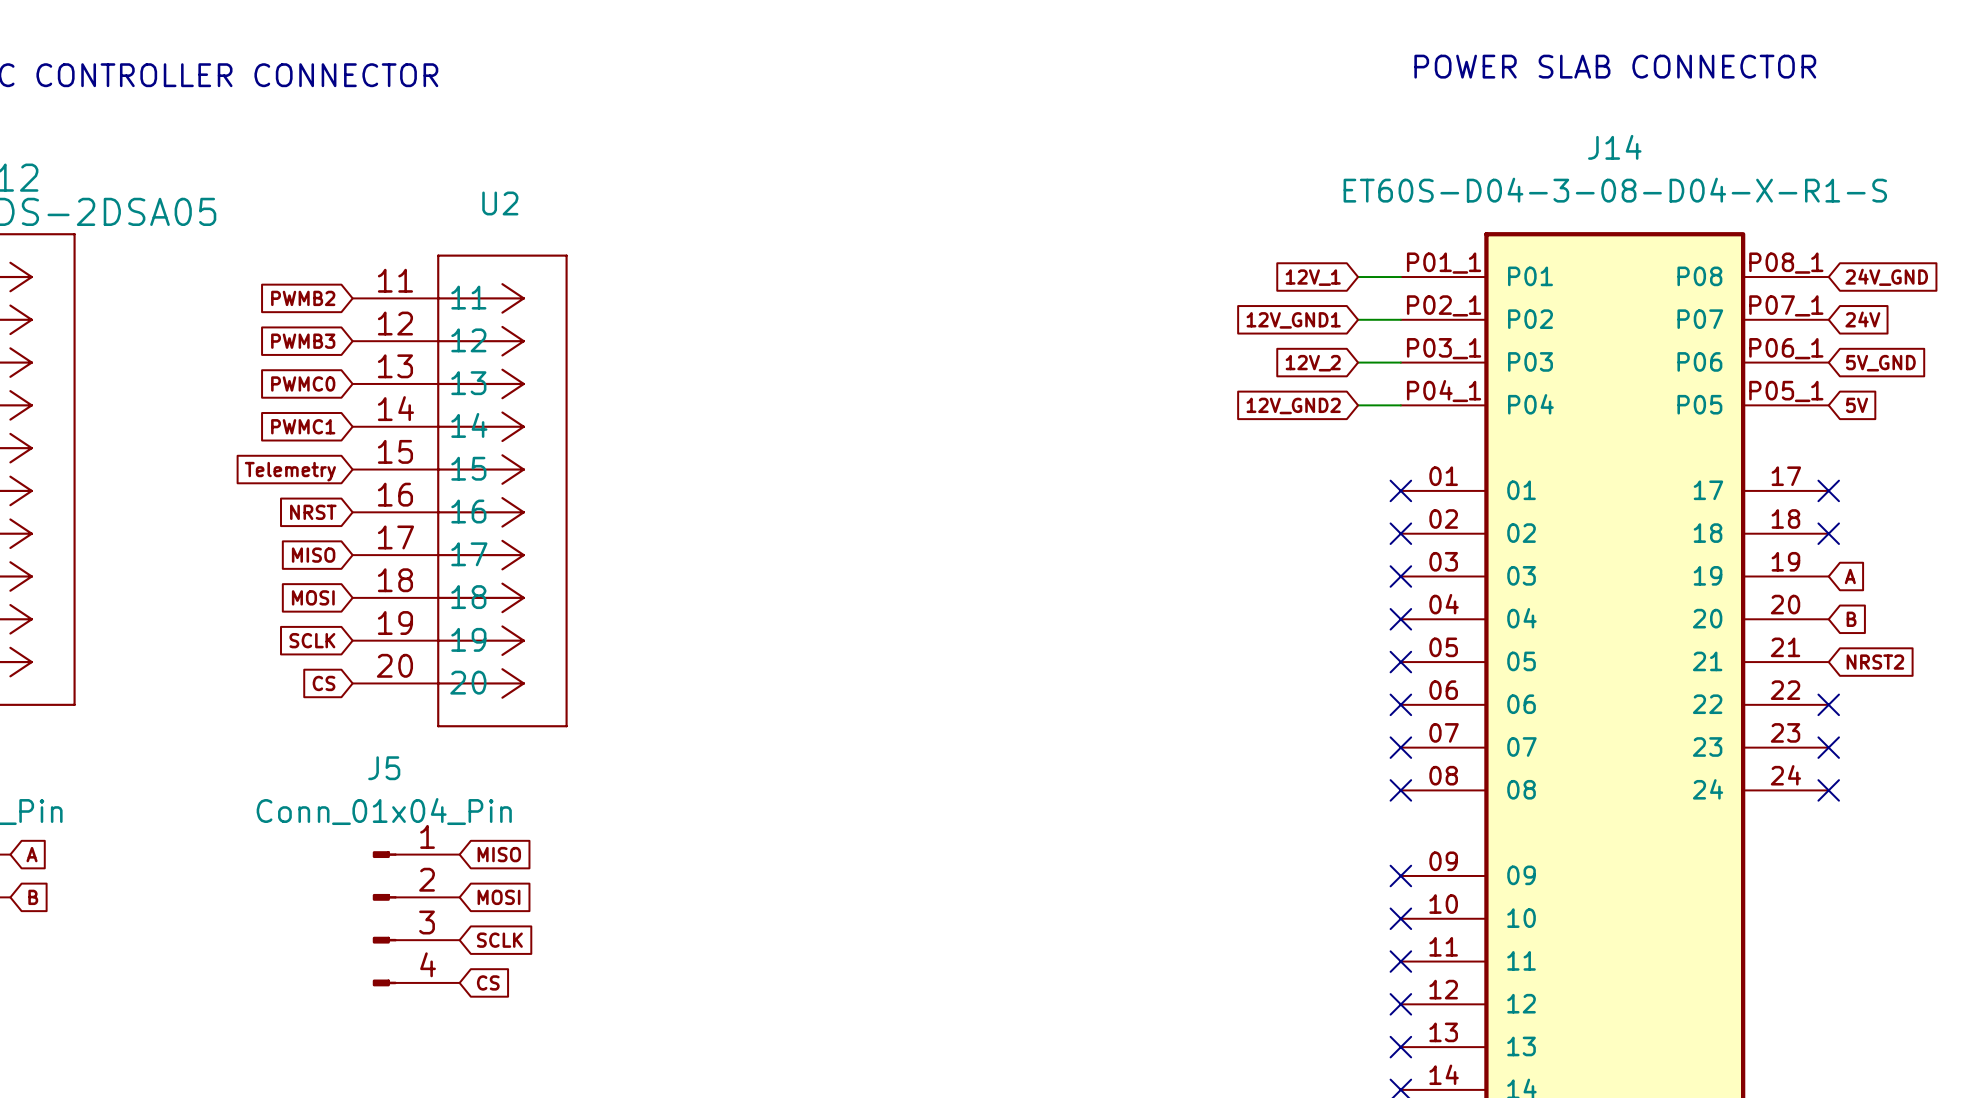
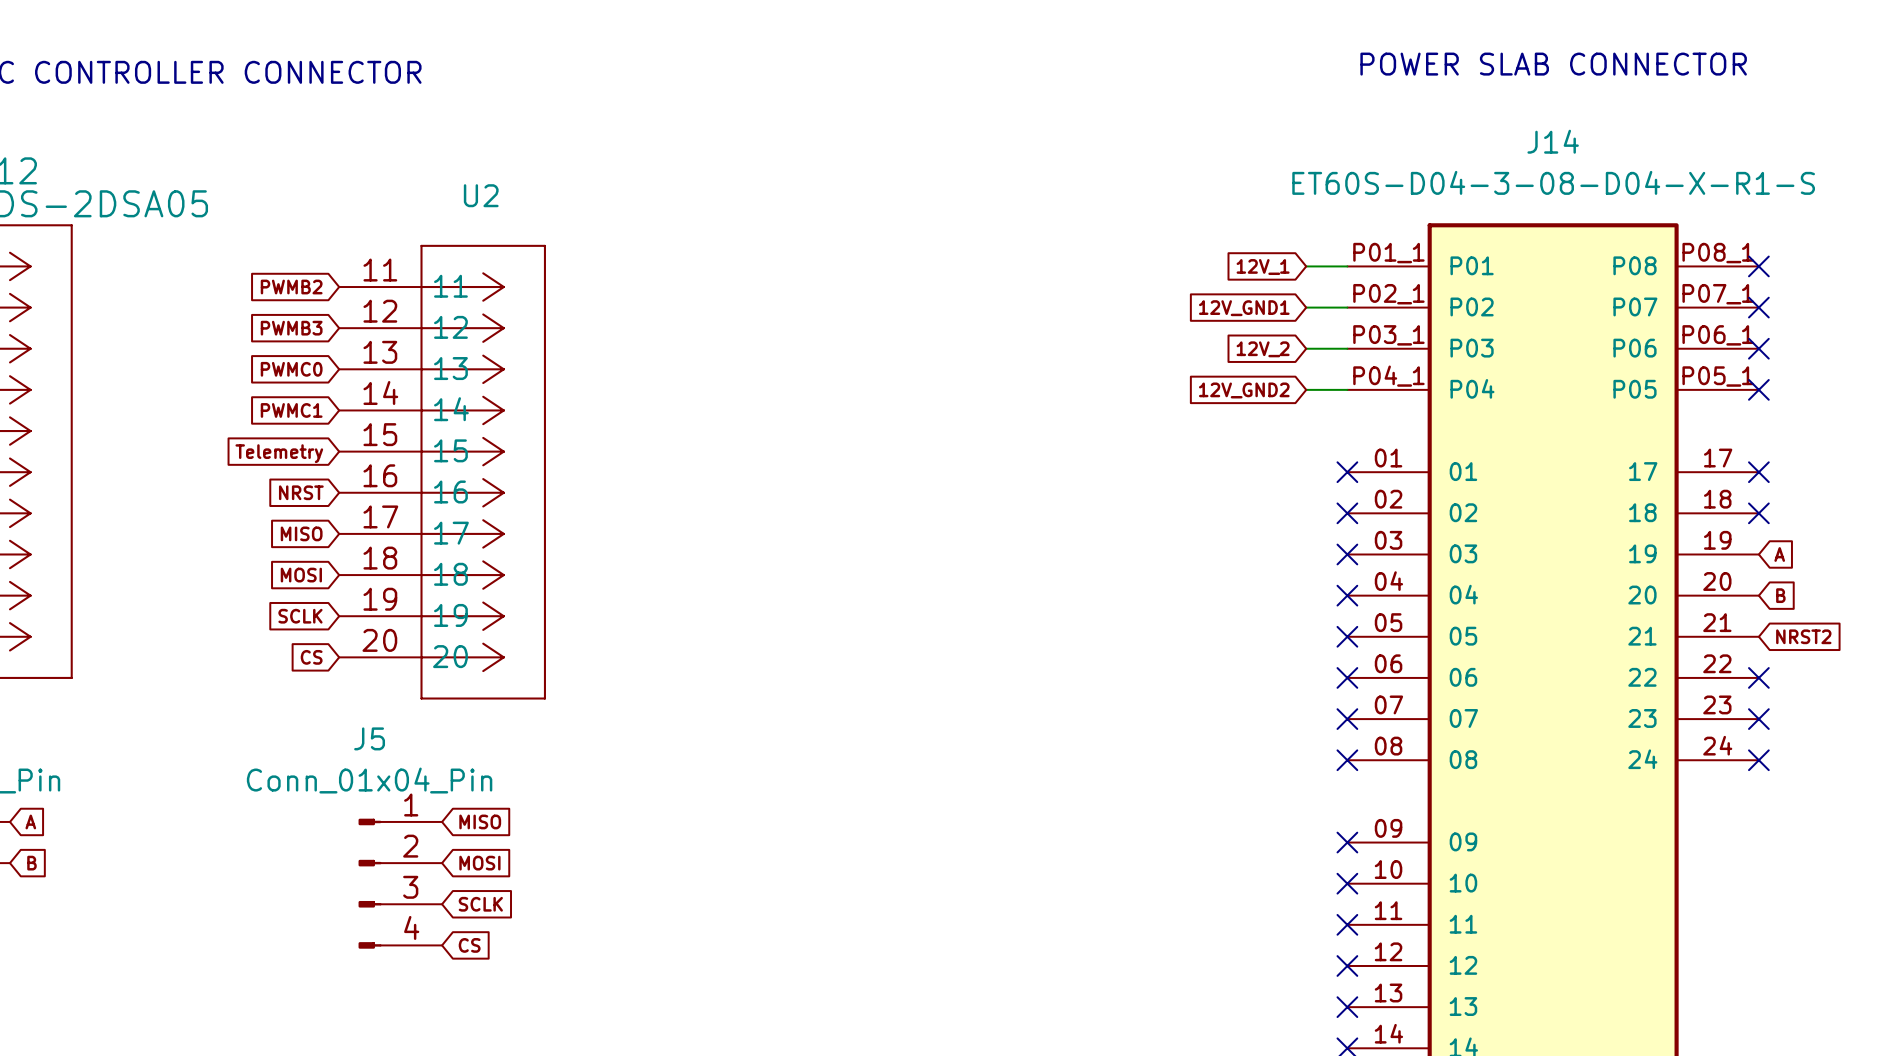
no-connect mark: none -> (1758, 266)
global label: 24V_GND (1886, 277) -> none
no-connect mark: none -> (1758, 307)
global label: 24V (1862, 319) -> none
no-connect mark: none -> (1758, 348)
global label: 5V_GND (1880, 363) -> none
no-connect mark: none -> (1758, 389)
global label: 5V (1857, 405) -> none

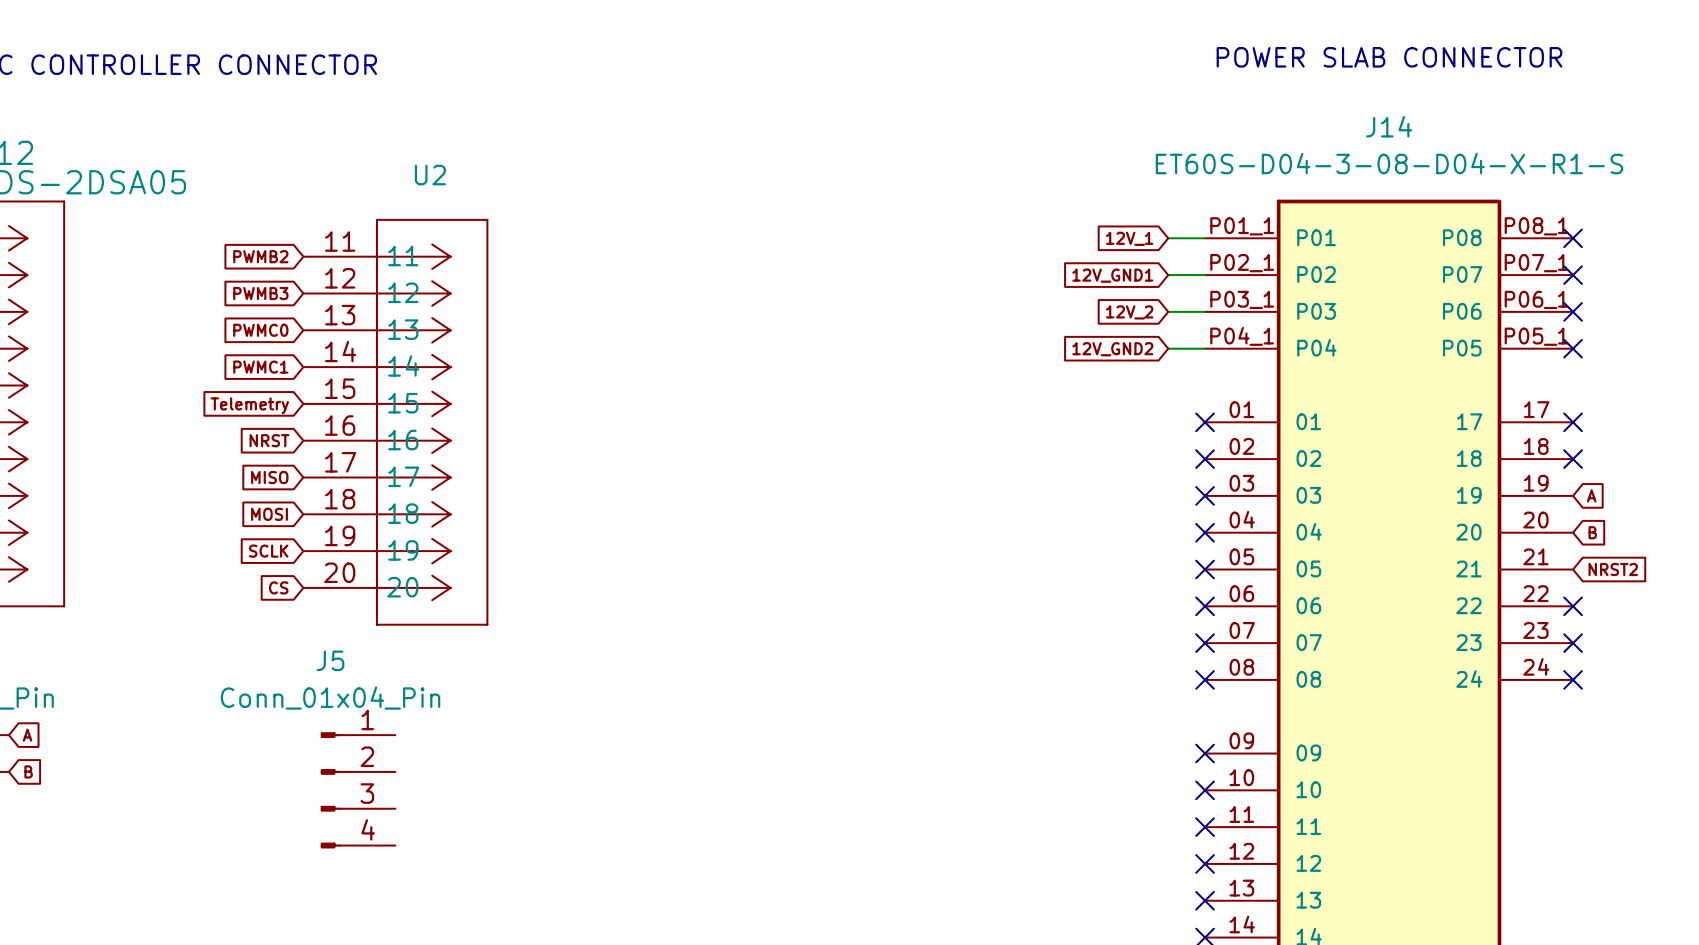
global label: MISO (480, 821) -> none
global label: MOSI (479, 863) -> none
global label: SCLK (480, 904) -> none
global label: CS (469, 945) -> none

